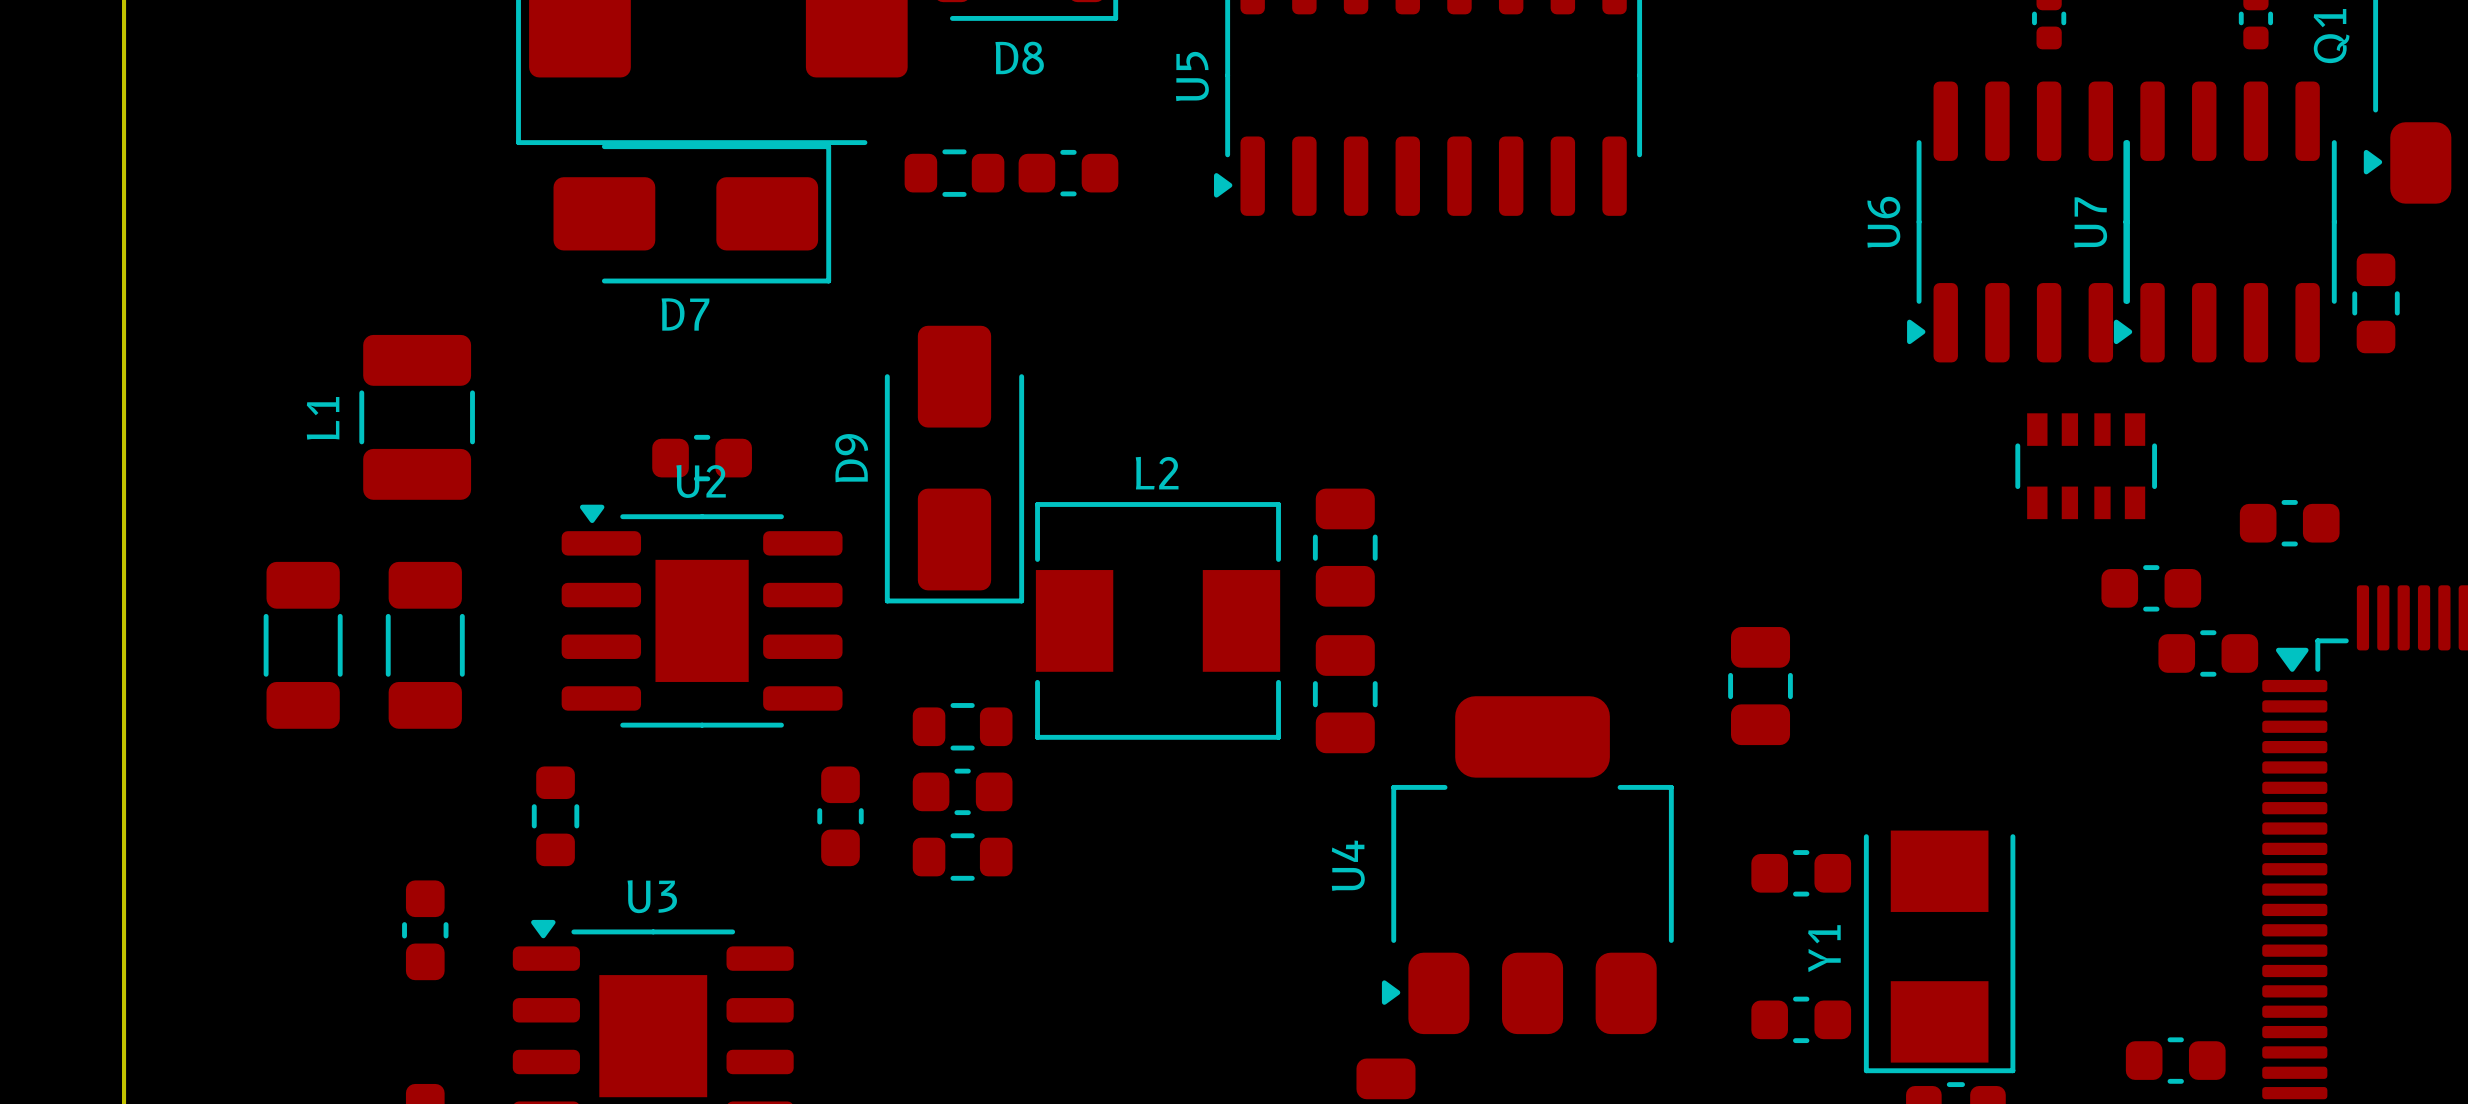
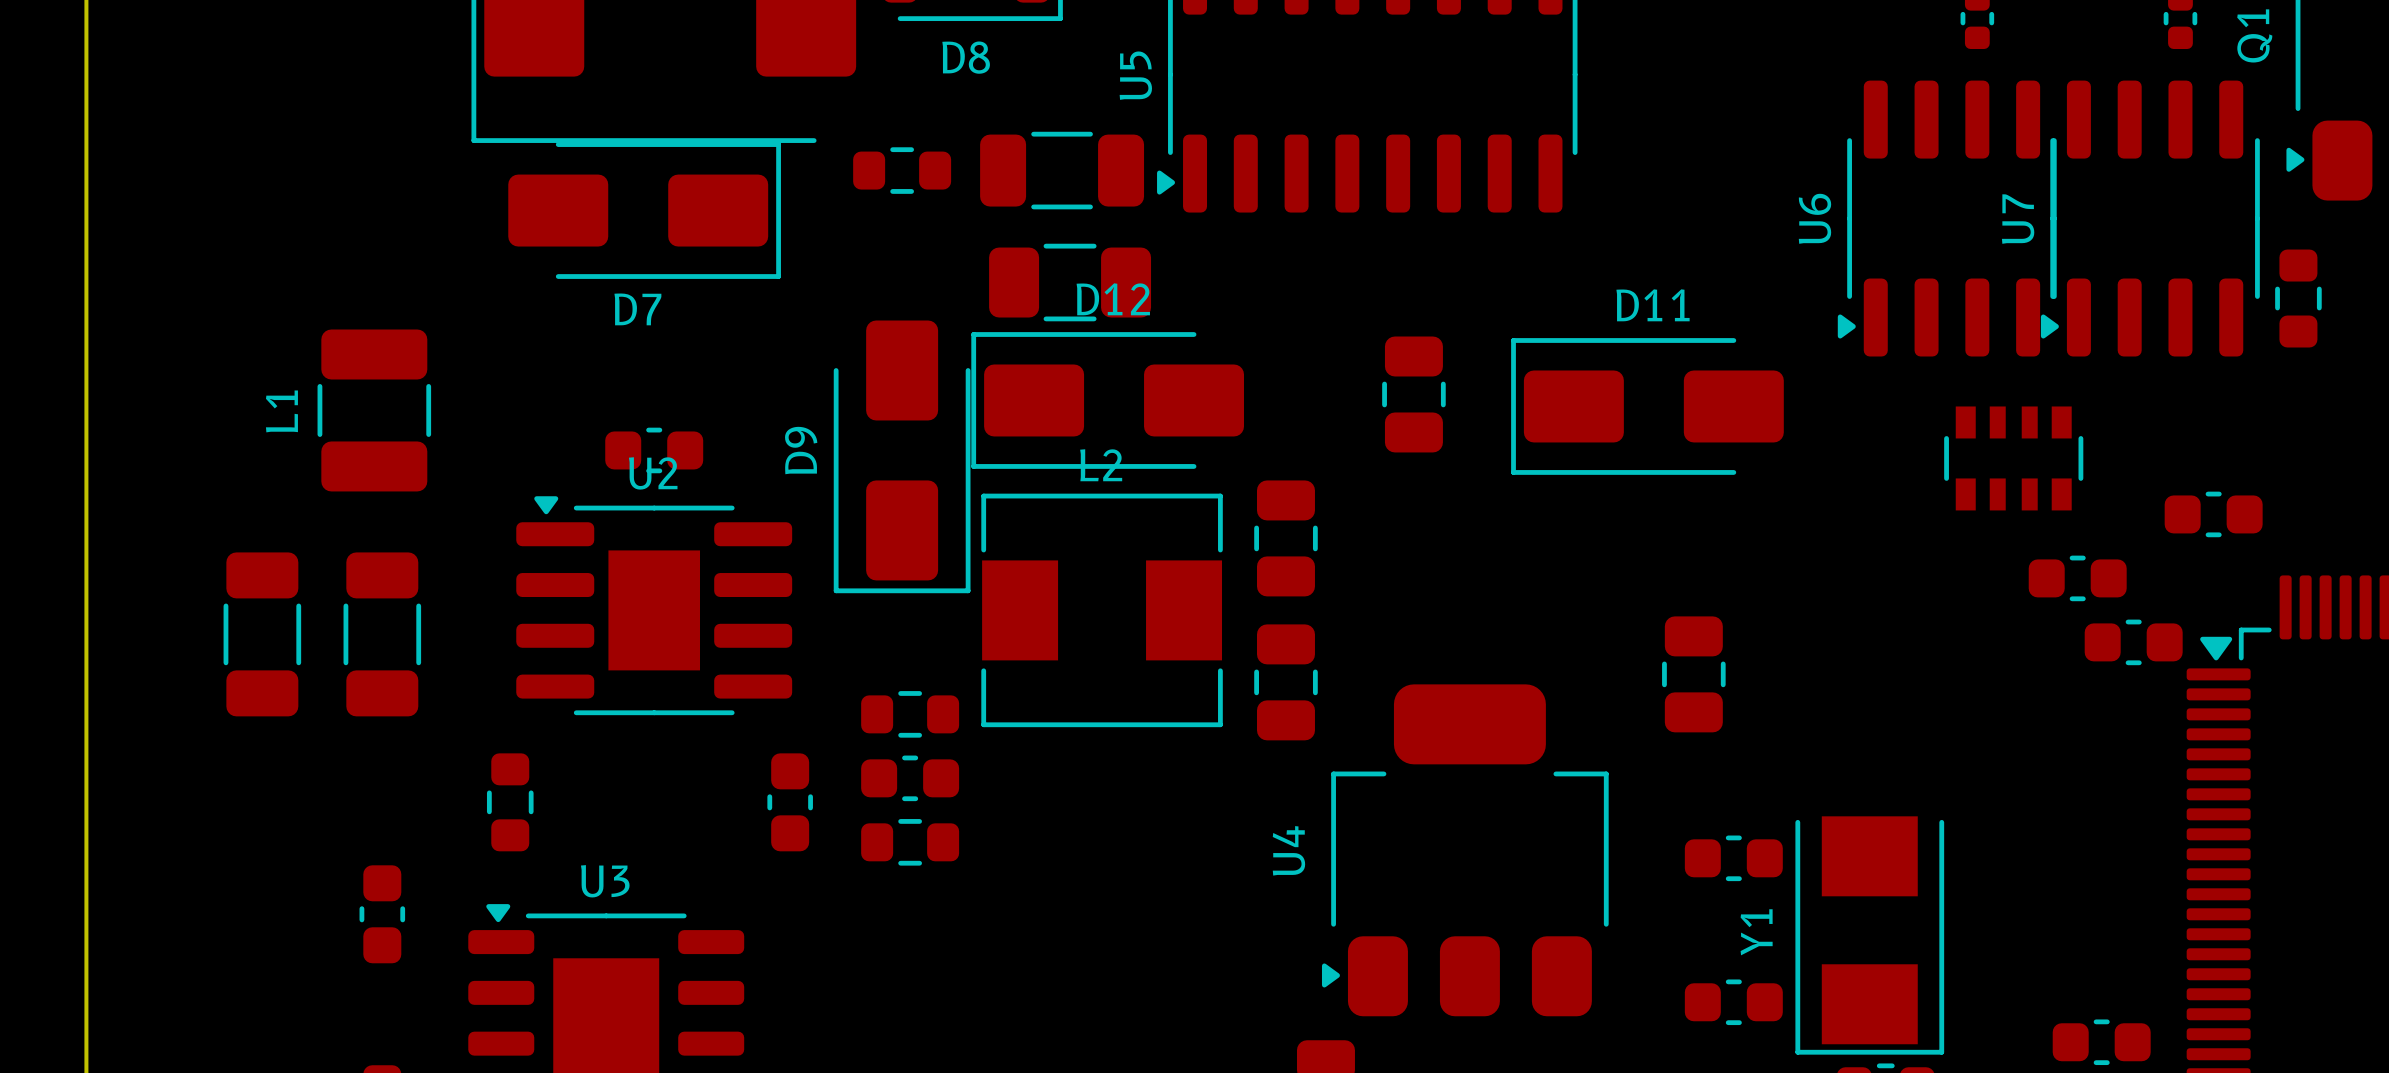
part: (1068, 173) -> none
part: none -> (1062, 170)
part: none -> (1070, 282)
part: none -> (1413, 394)
D12: none -> (1107, 400)
D11: none -> (1647, 406)

